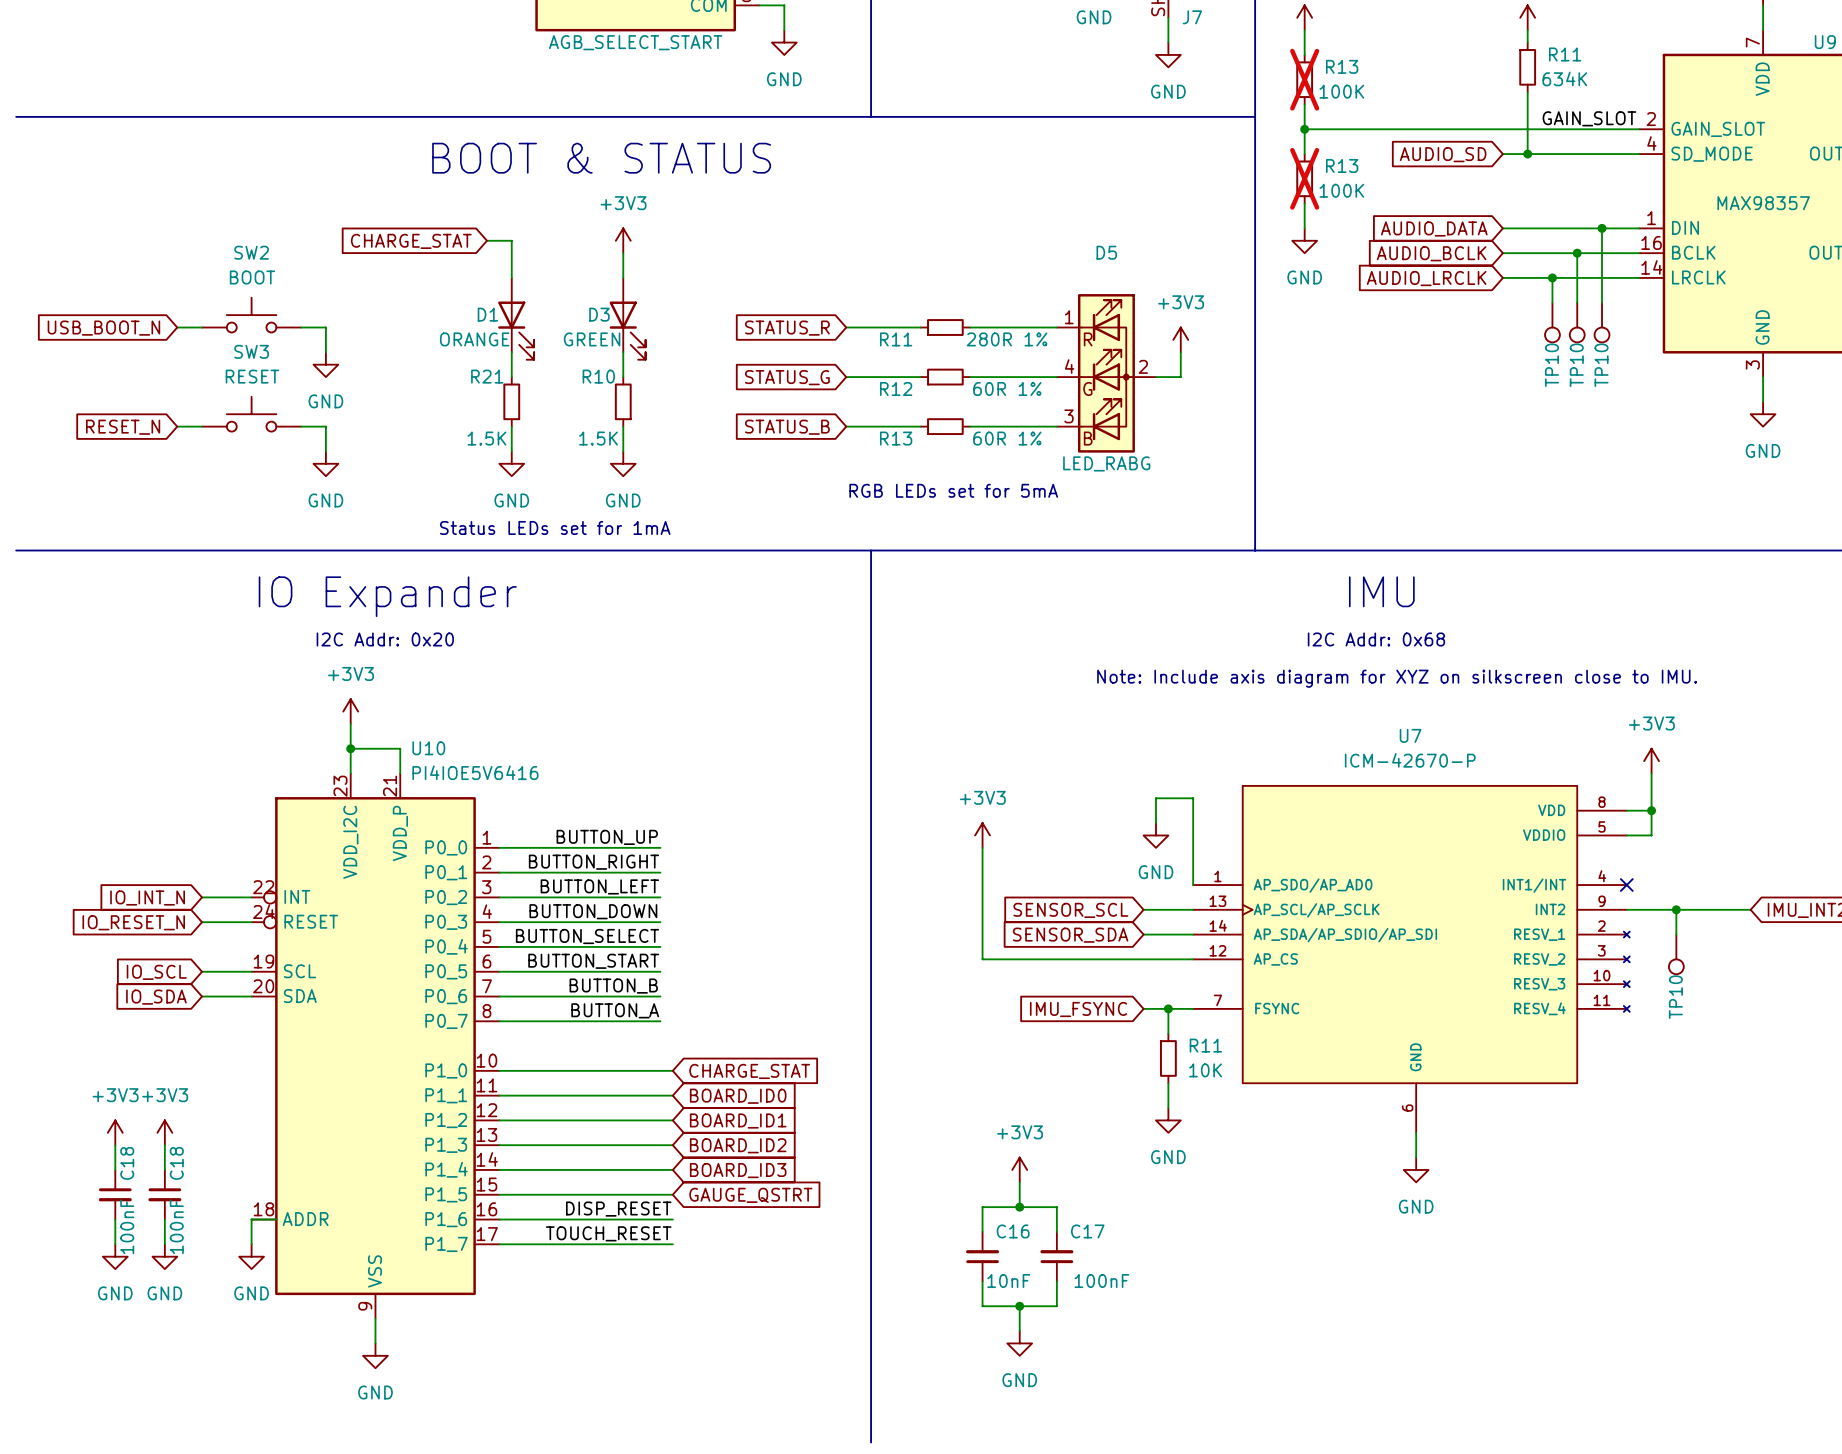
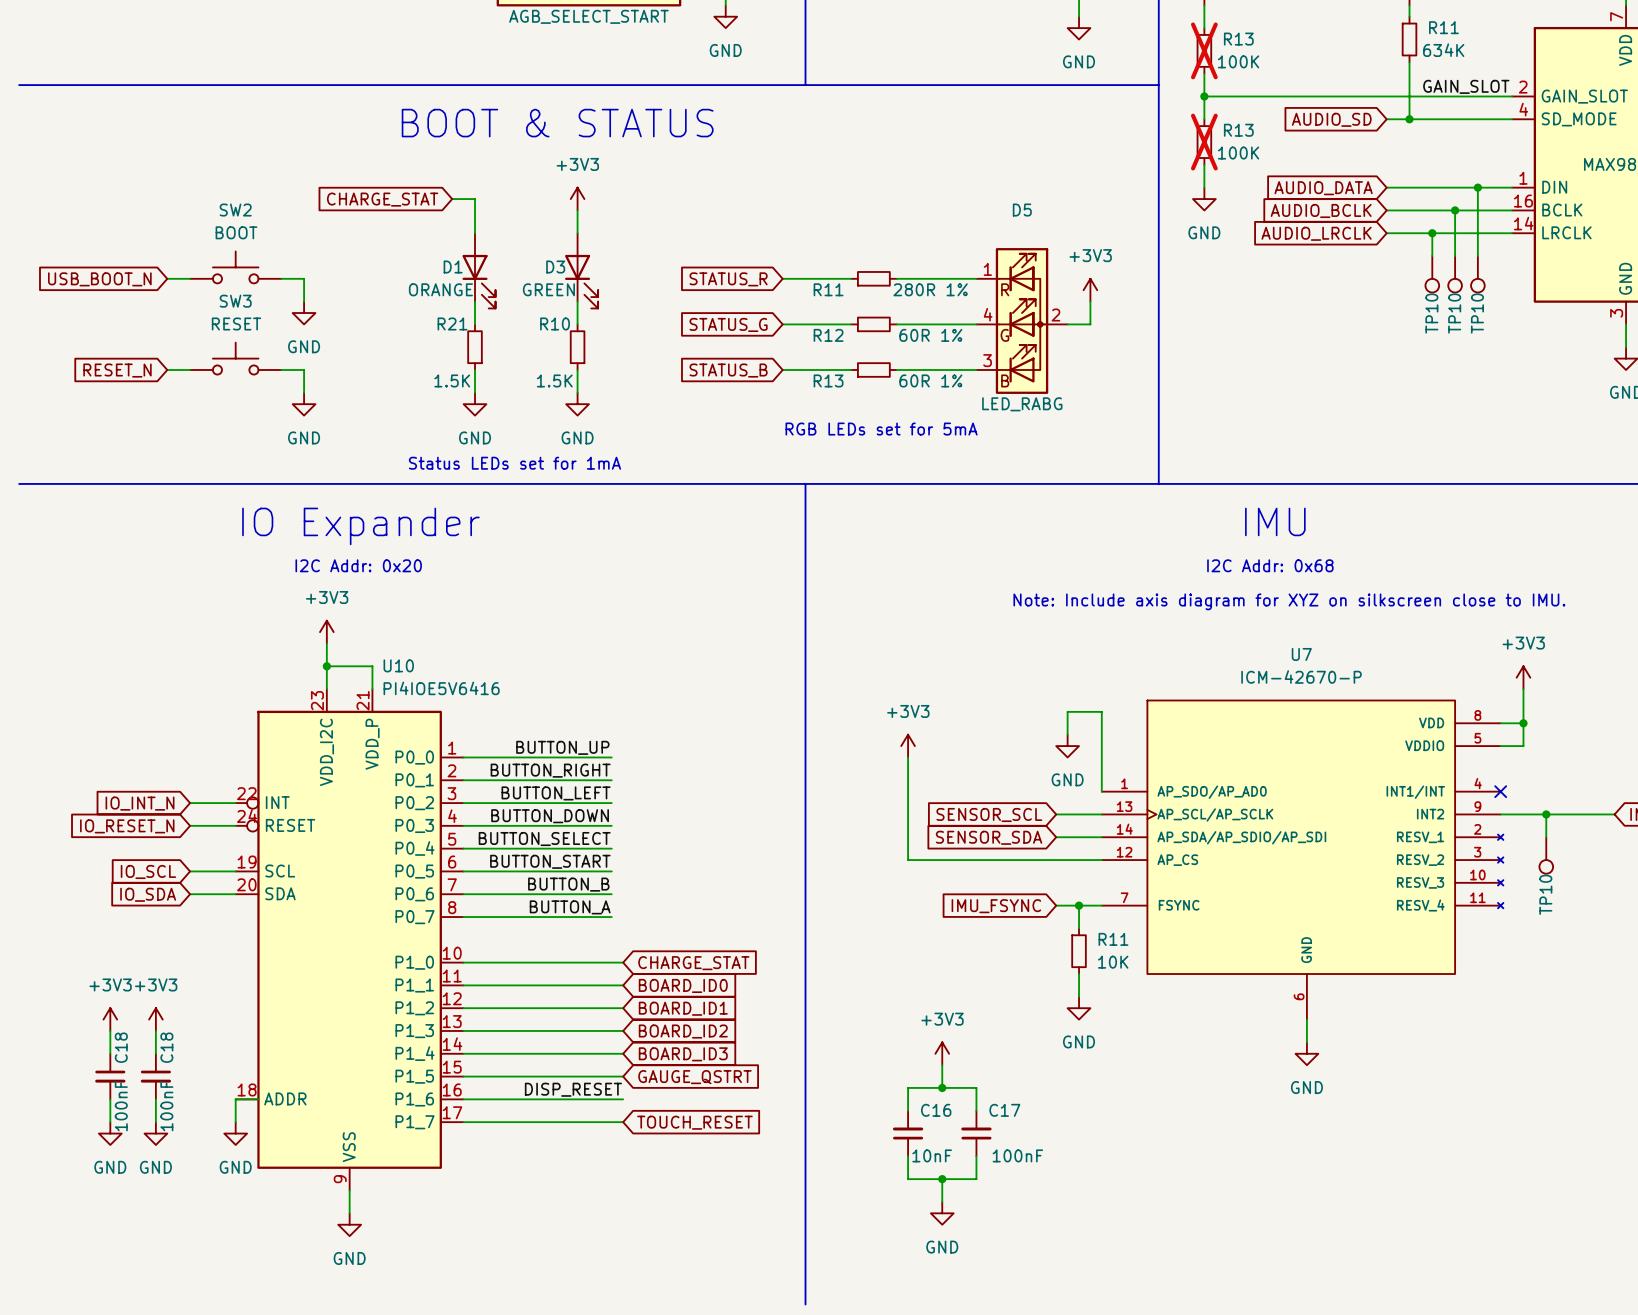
label: TOUCH_RESET (608, 1233) -> none
global label: none -> TOUCH_RESET (694, 1122)

